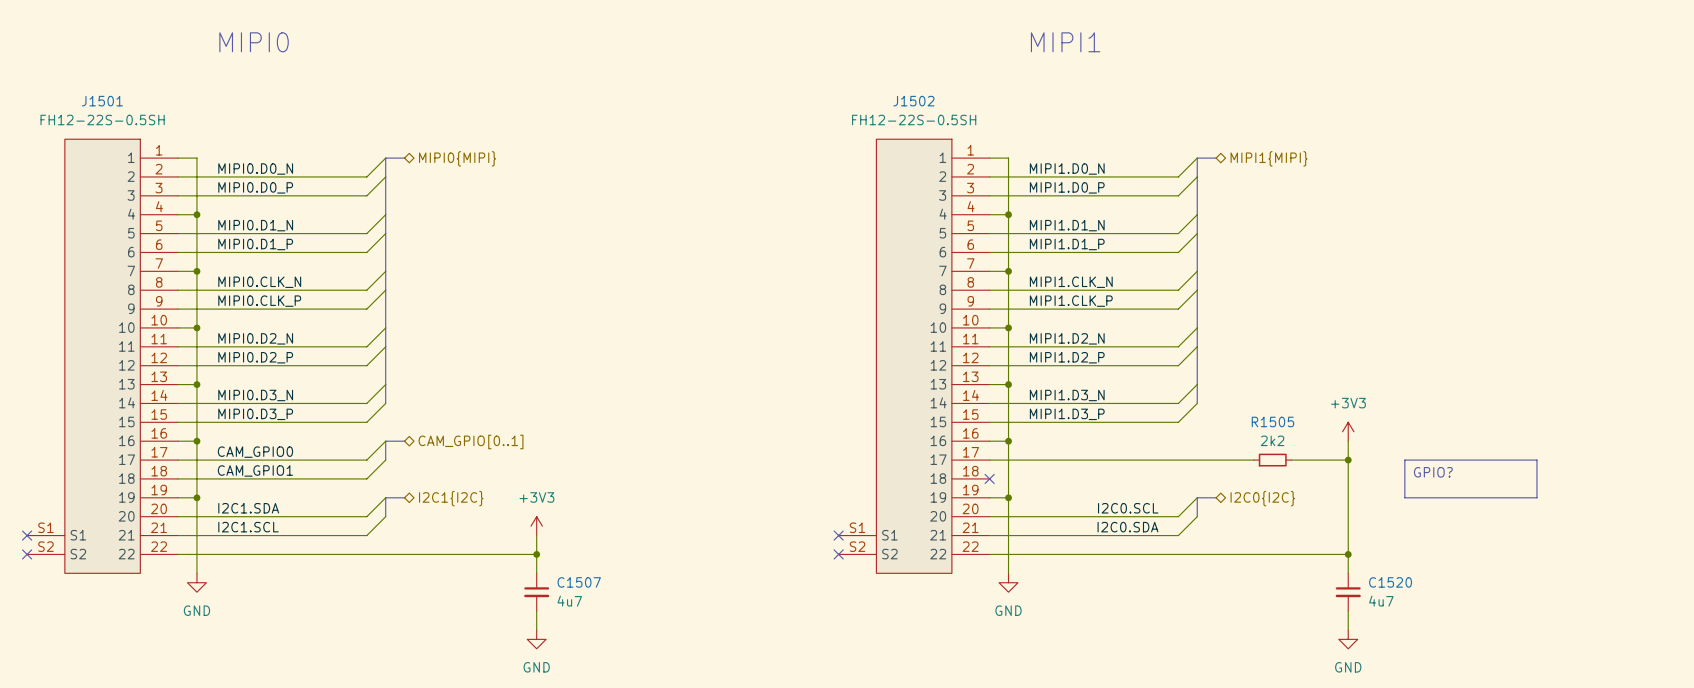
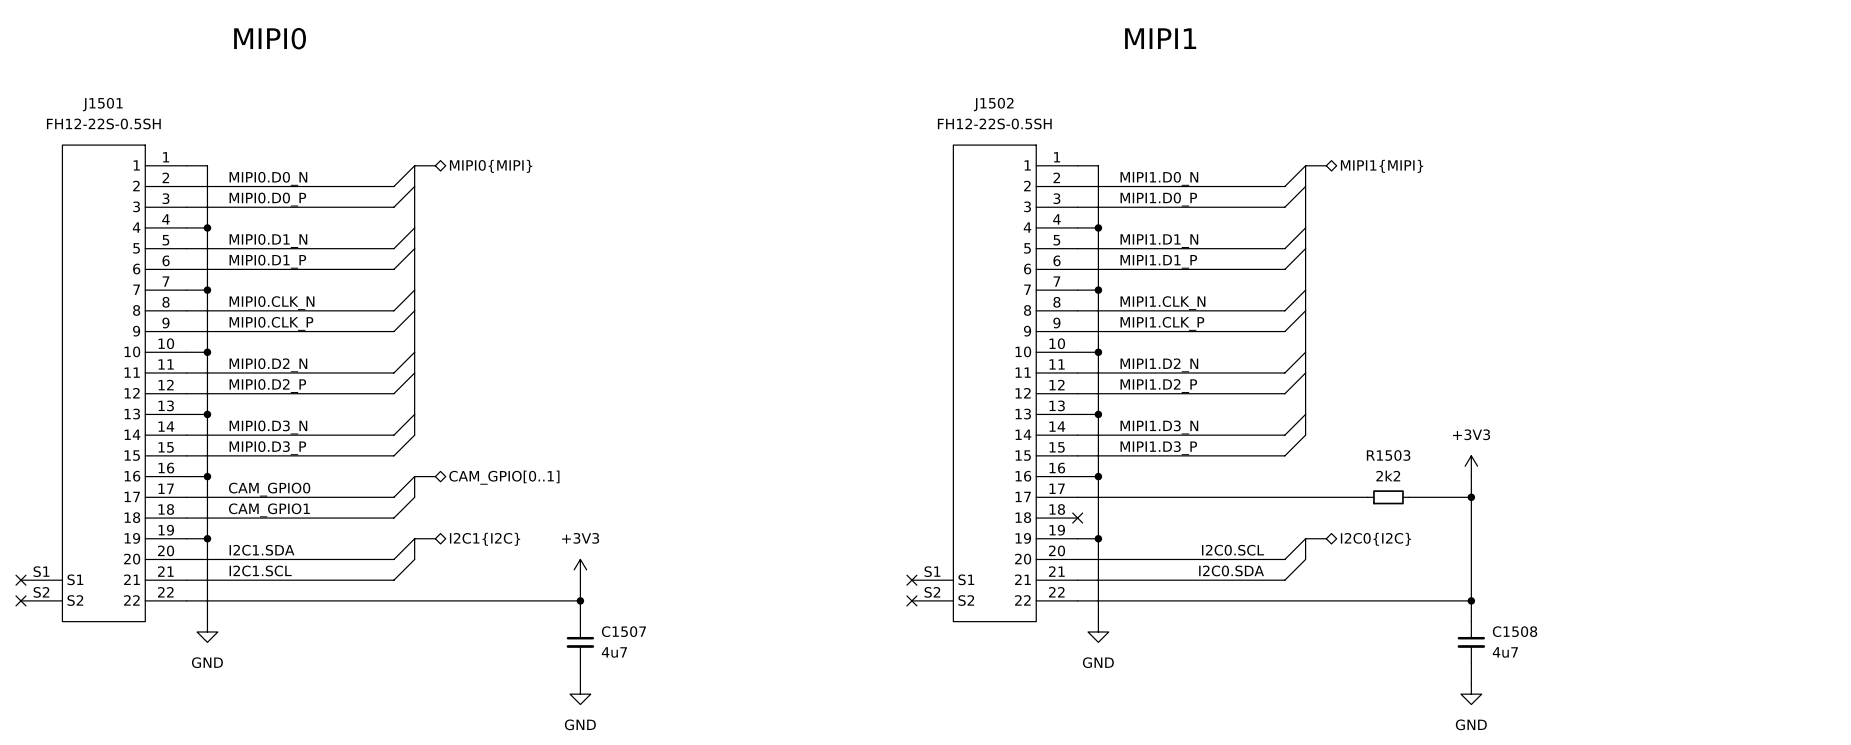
R1505 name: R1505 (1272, 421) -> R1503 (1388, 455)
line: (1404, 460) (1536, 460) (1536, 497) (1404, 497) (1404, 460) -> none
text: GPIO? (1433, 472) -> none
C1520 name: C1520 (1390, 582) -> C1508 (1515, 631)

